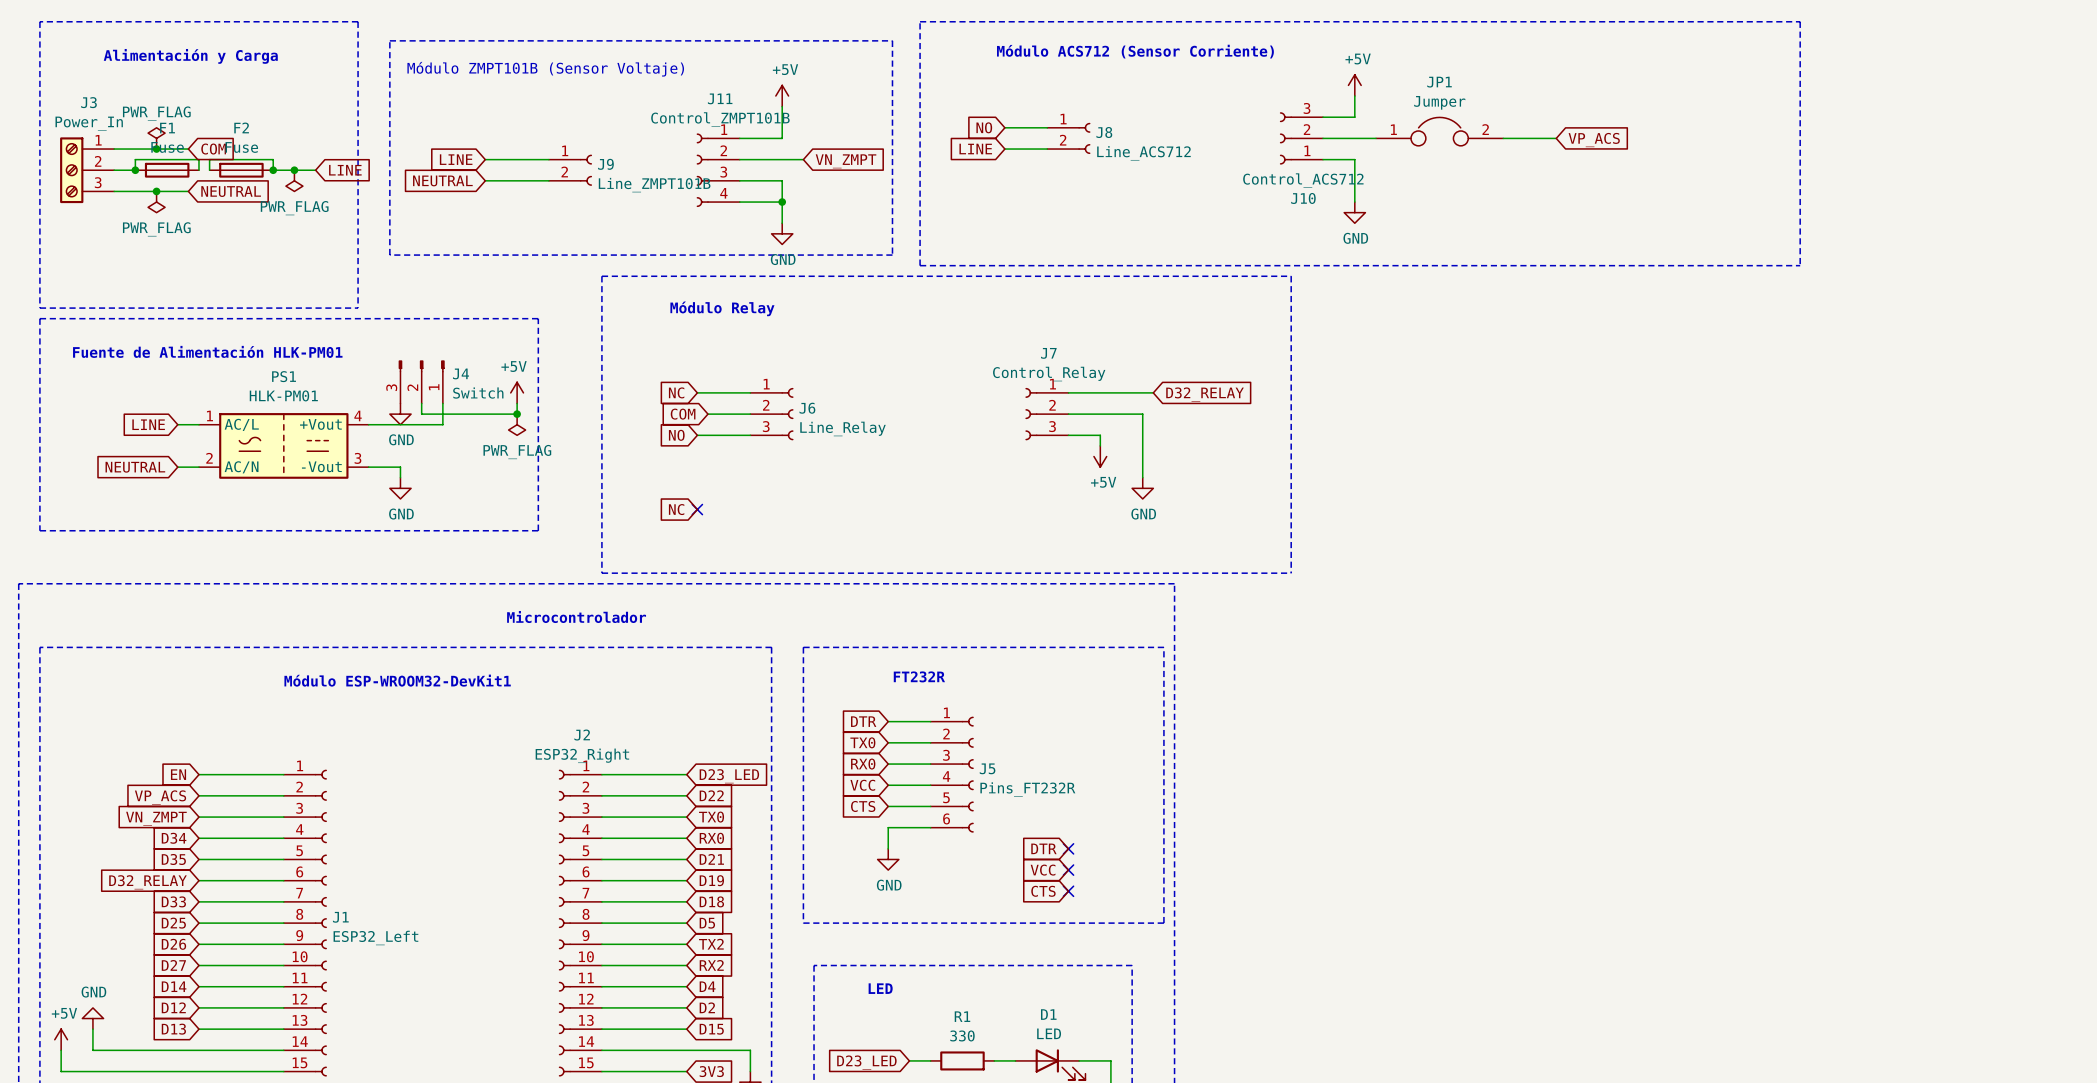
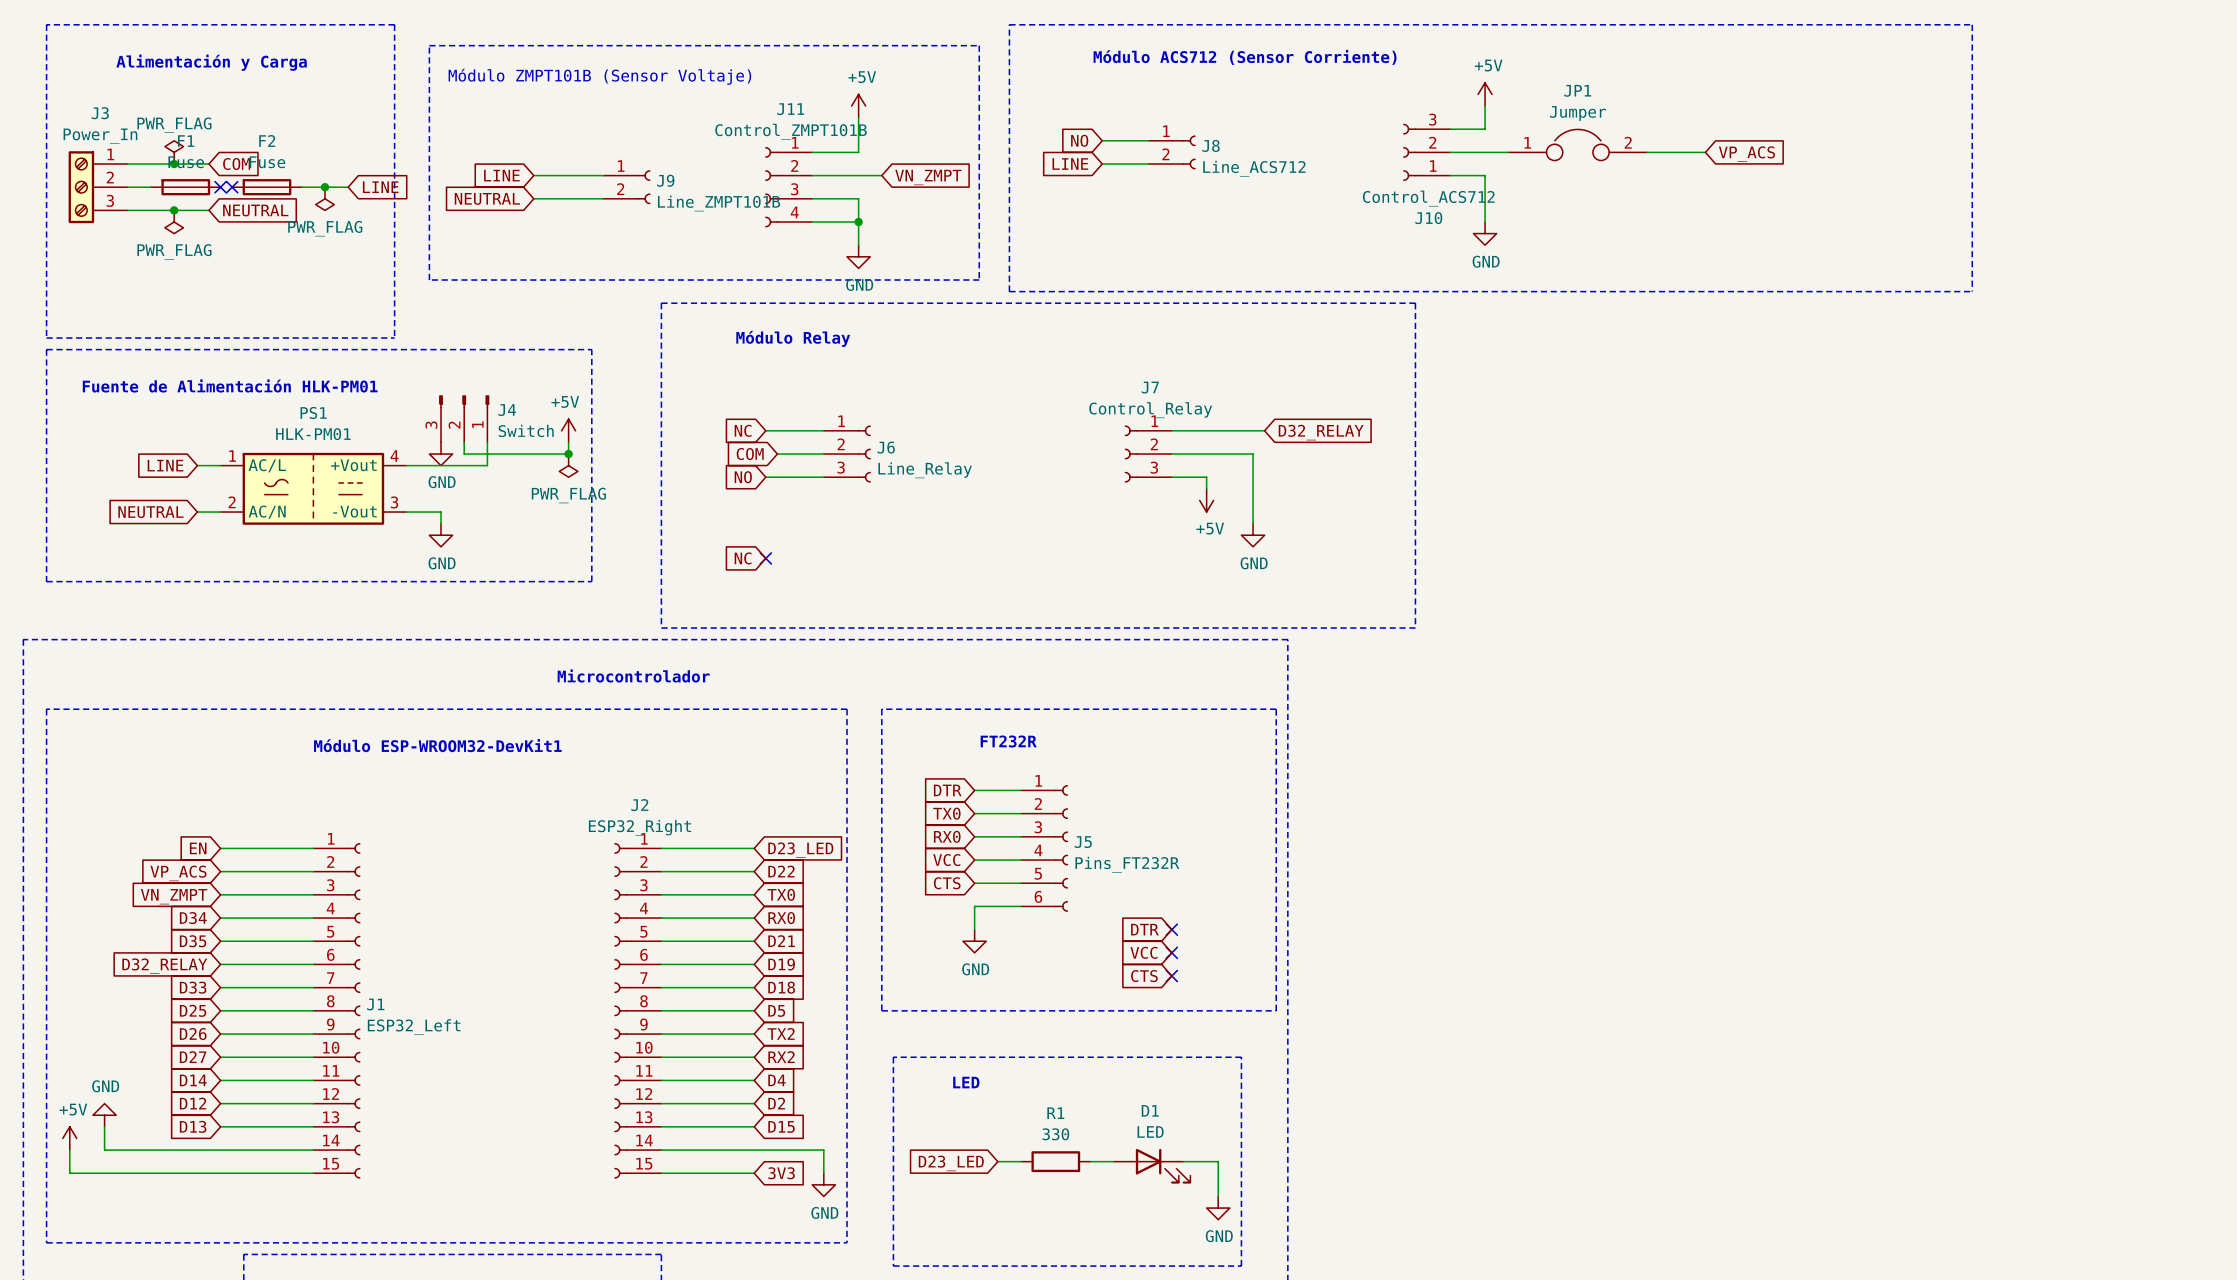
wire: (135, 170) (135, 159) (198, 159) (198, 170) -> none
junction: (135, 170) -> none
no-connect mark: none -> (220, 187)
wire: (209, 170) (209, 159) (273, 159) (273, 170) -> none
no-connect mark: none -> (232, 187)
junction: (273, 170) -> none

